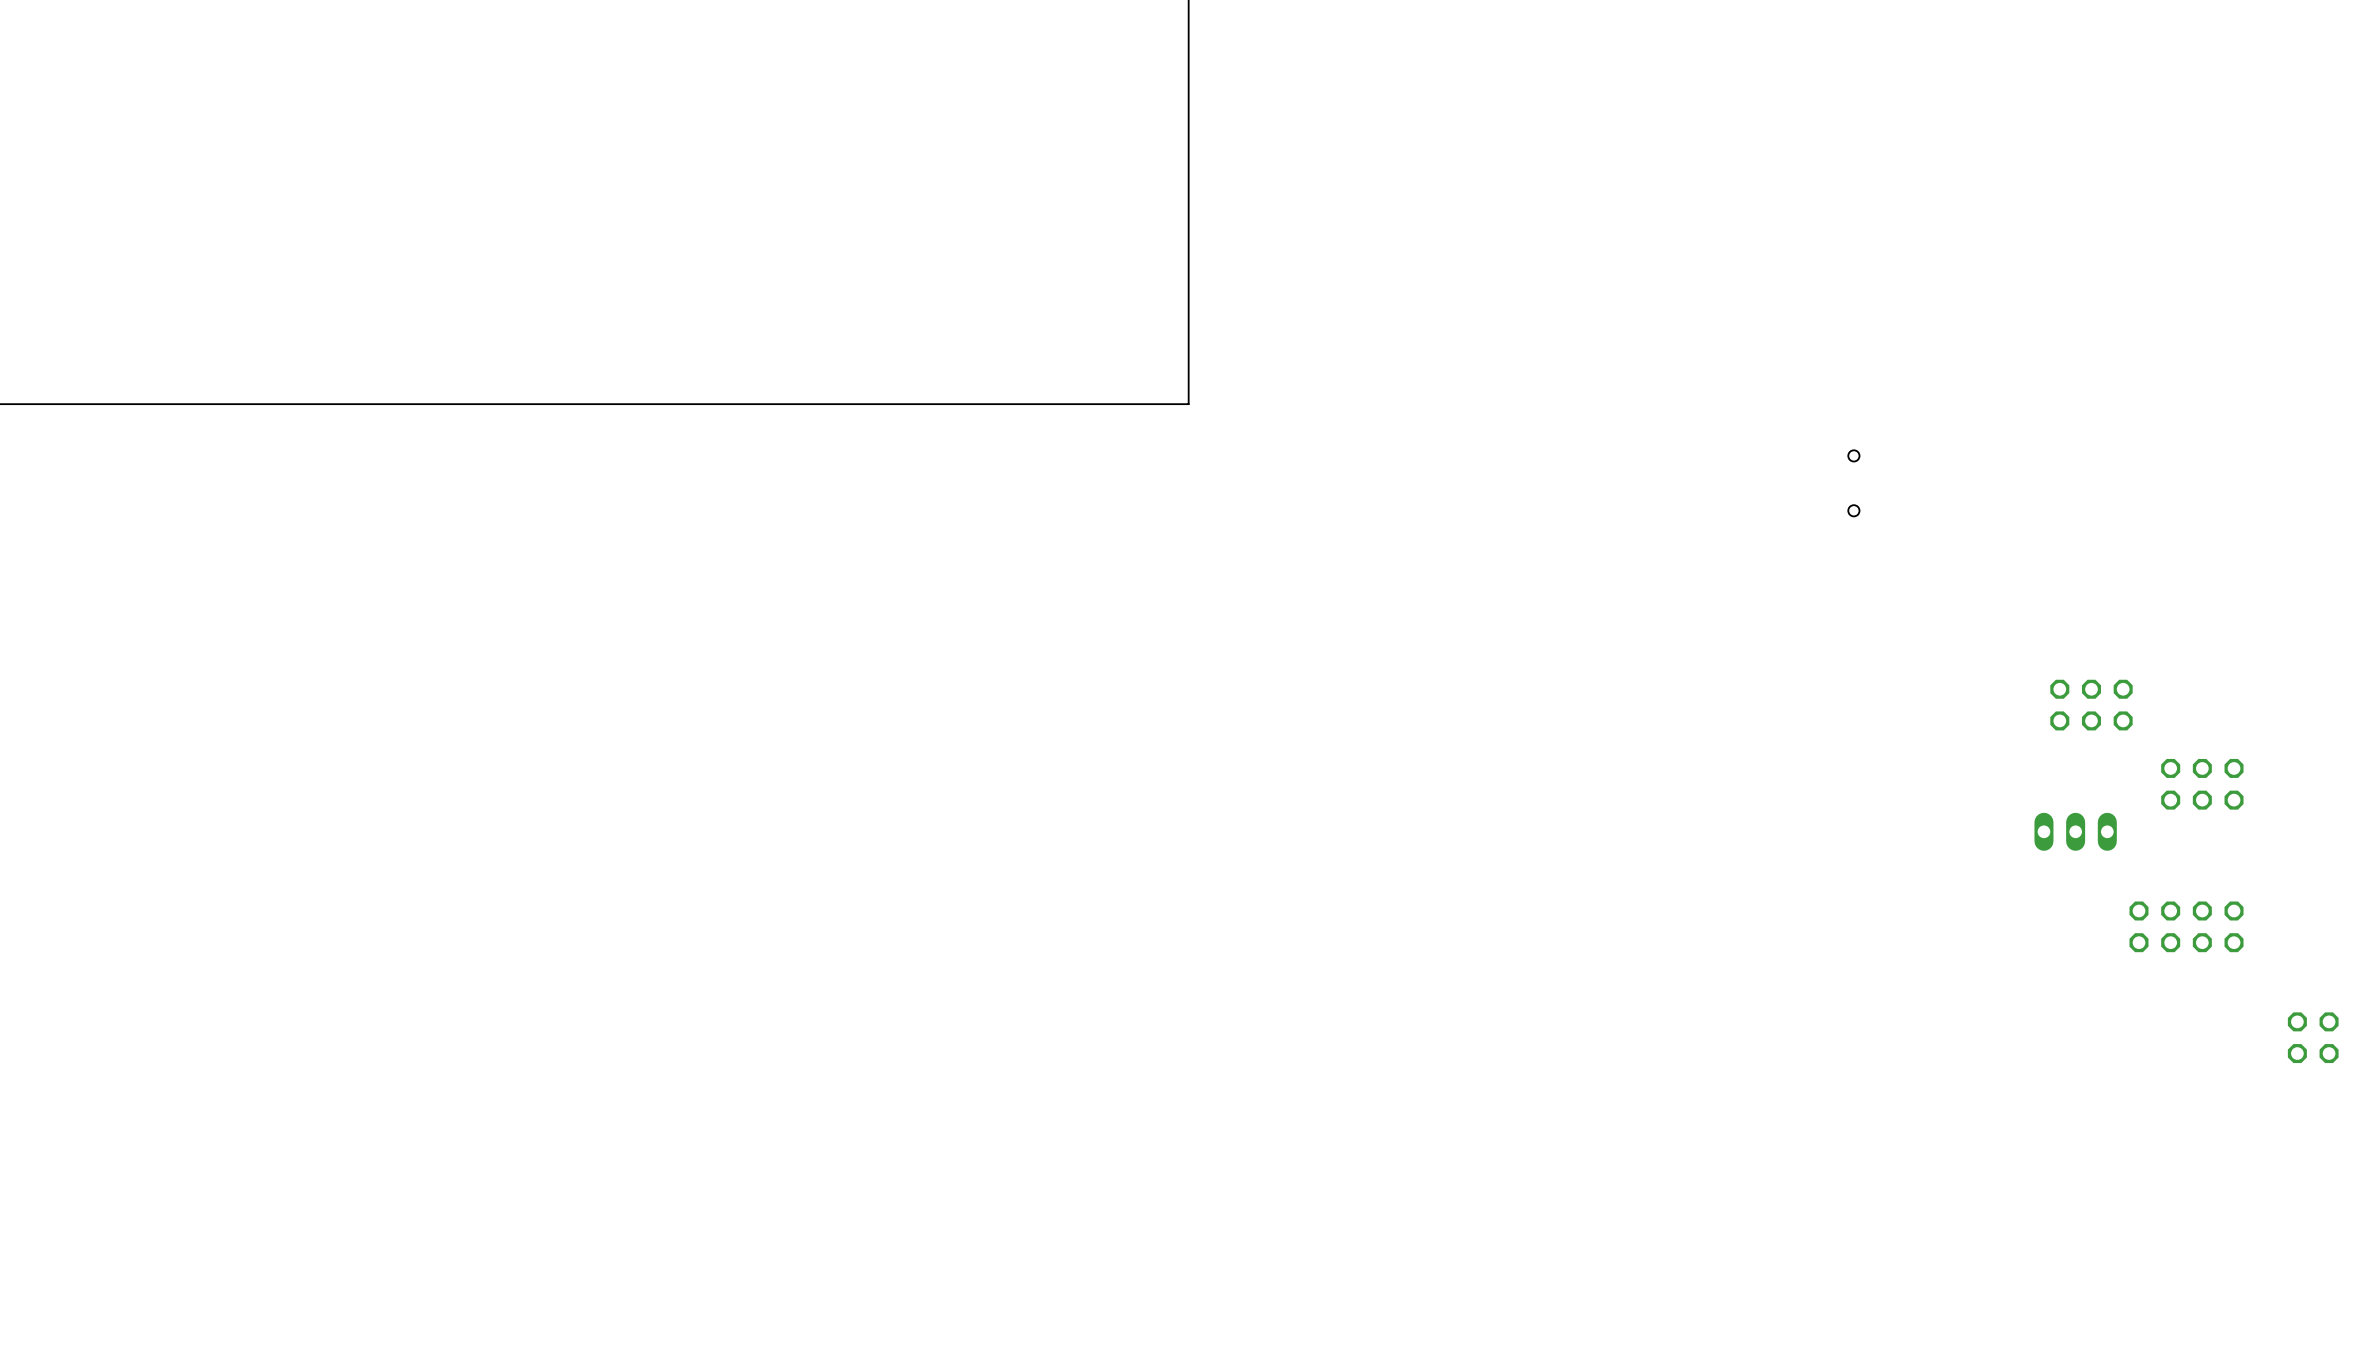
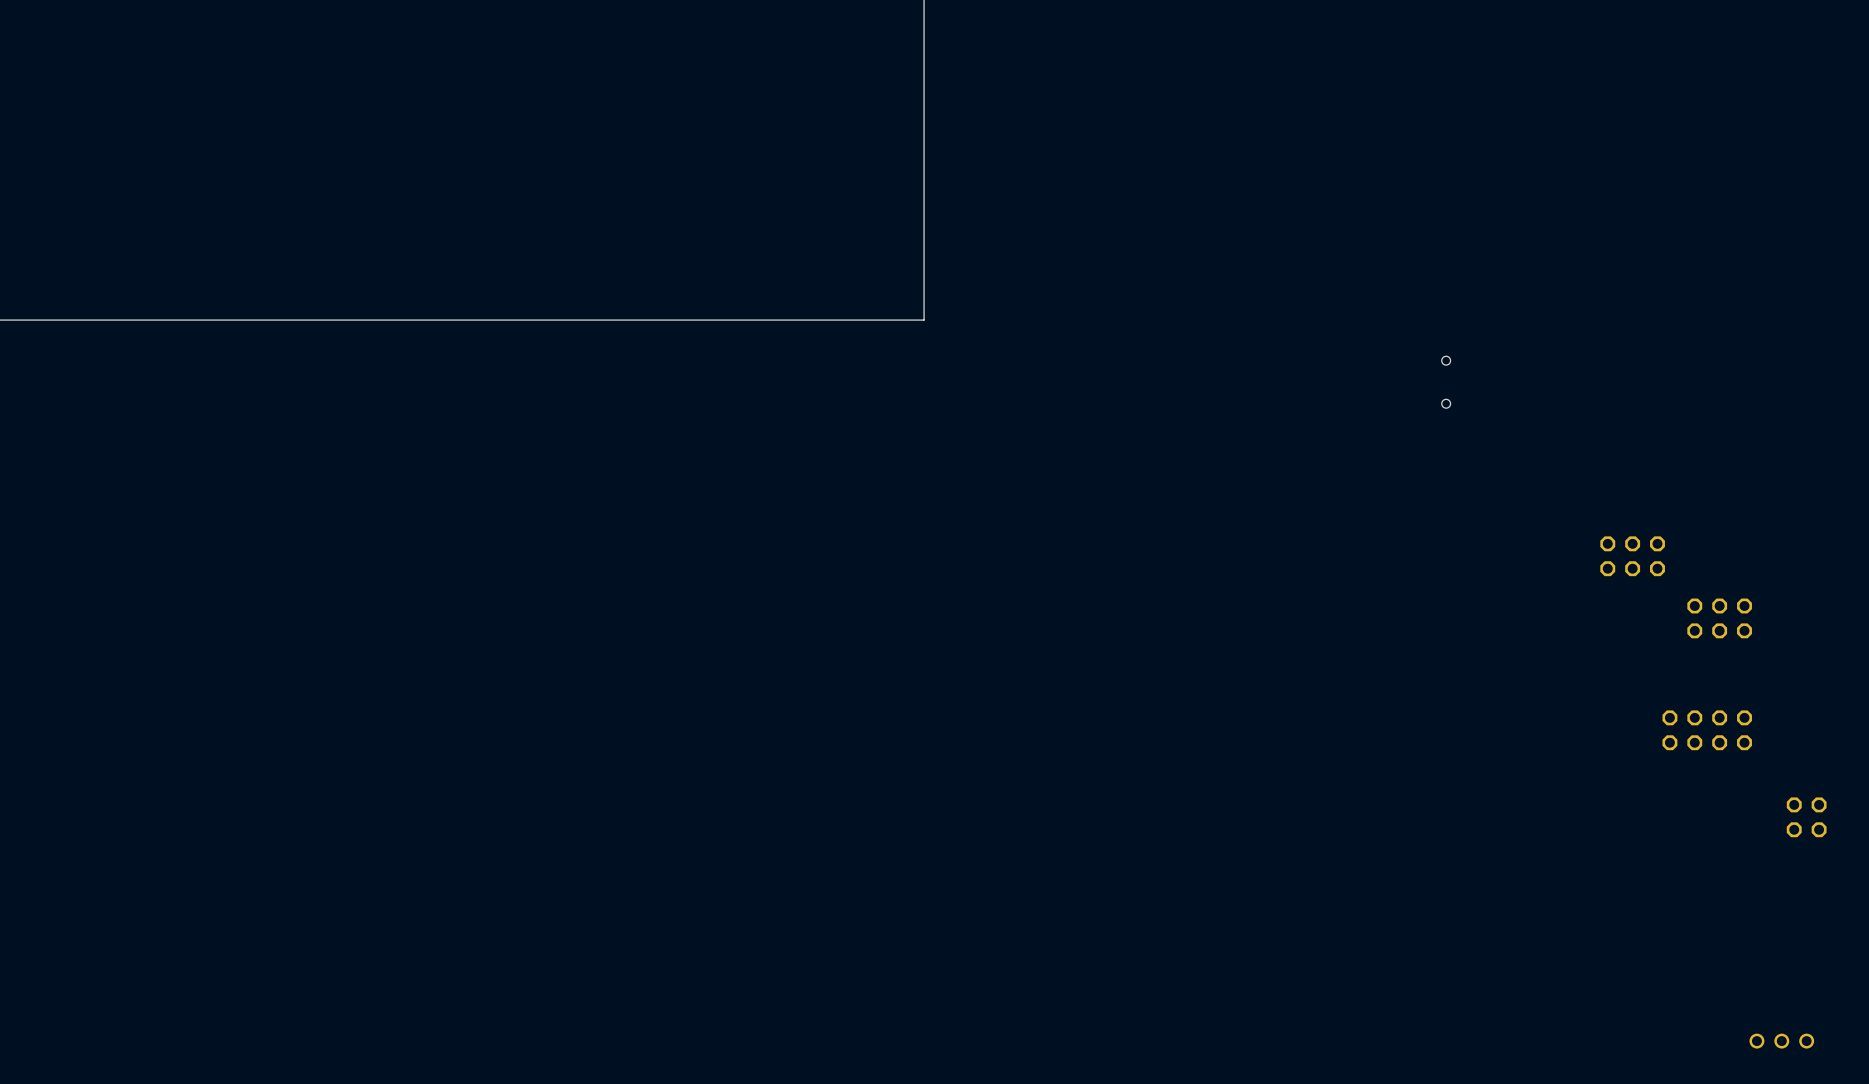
part: (2075, 831) -> none
part: none -> (1781, 1041)

